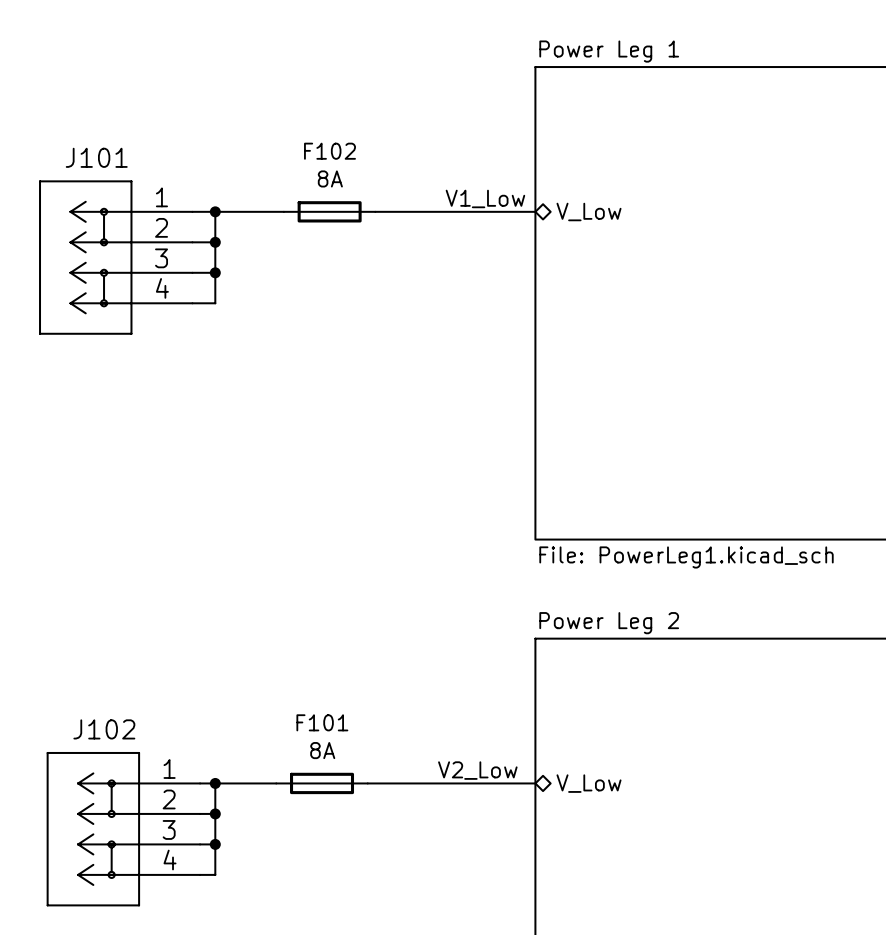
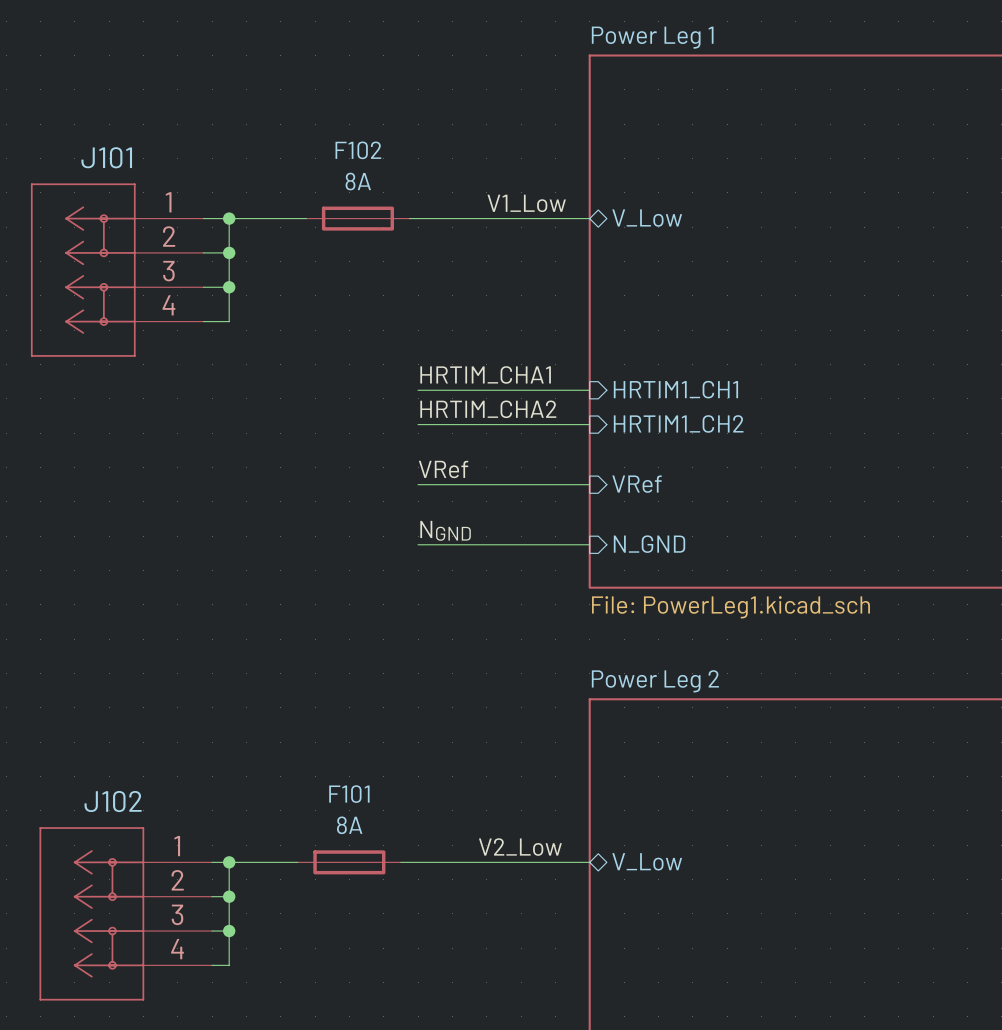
label: none -> HRTIM_CHA1 (485, 374)
wire: none -> (418, 390) (589, 390)
sheet pin: none -> HRTIM1_CH1 (675, 389)
label: none -> HRTIM_CHA2 (488, 409)
wire: none -> (418, 424) (589, 424)
sheet pin: none -> HRTIM1_CH2 (678, 423)
label: none -> VRef (443, 469)
sheet pin: none -> VRef (637, 484)
wire: none -> (418, 484) (589, 484)
label: none -> NGND (445, 530)
wire: none -> (418, 544) (589, 544)
sheet pin: none -> N_GND (649, 544)

